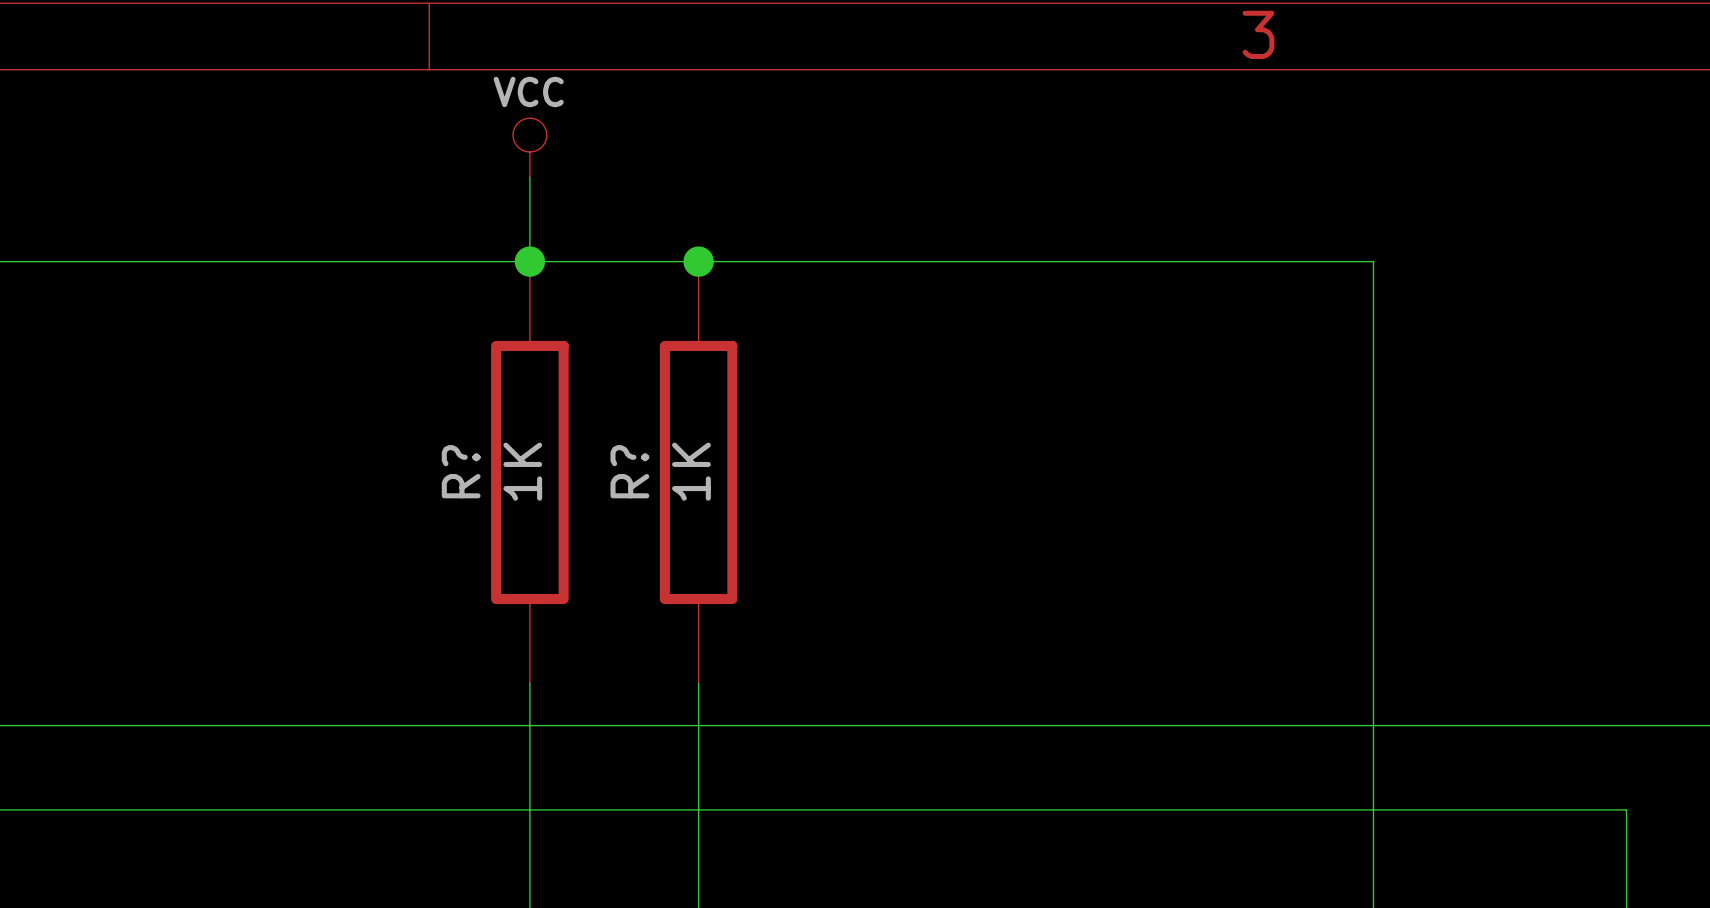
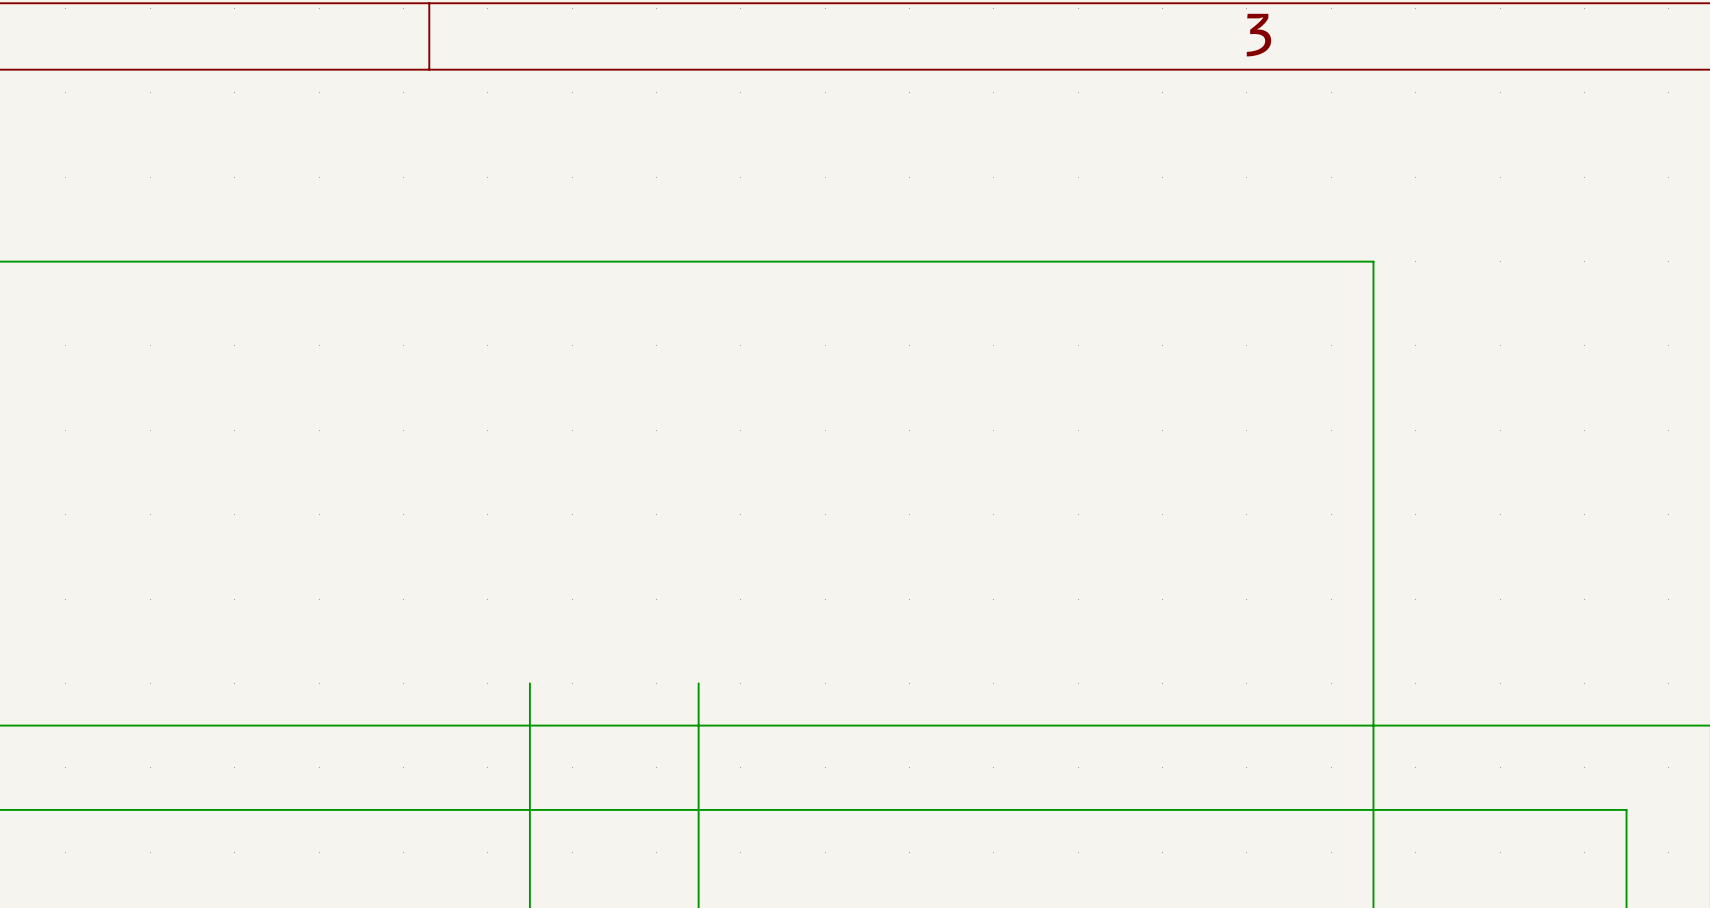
power symbol: VCC (529, 147) -> none
wire: (529, 177) (529, 261) -> none
junction: (529, 261) -> none
junction: (698, 261) -> none
R?: 1K (529, 472) -> none
R?: 1K (698, 472) -> none

